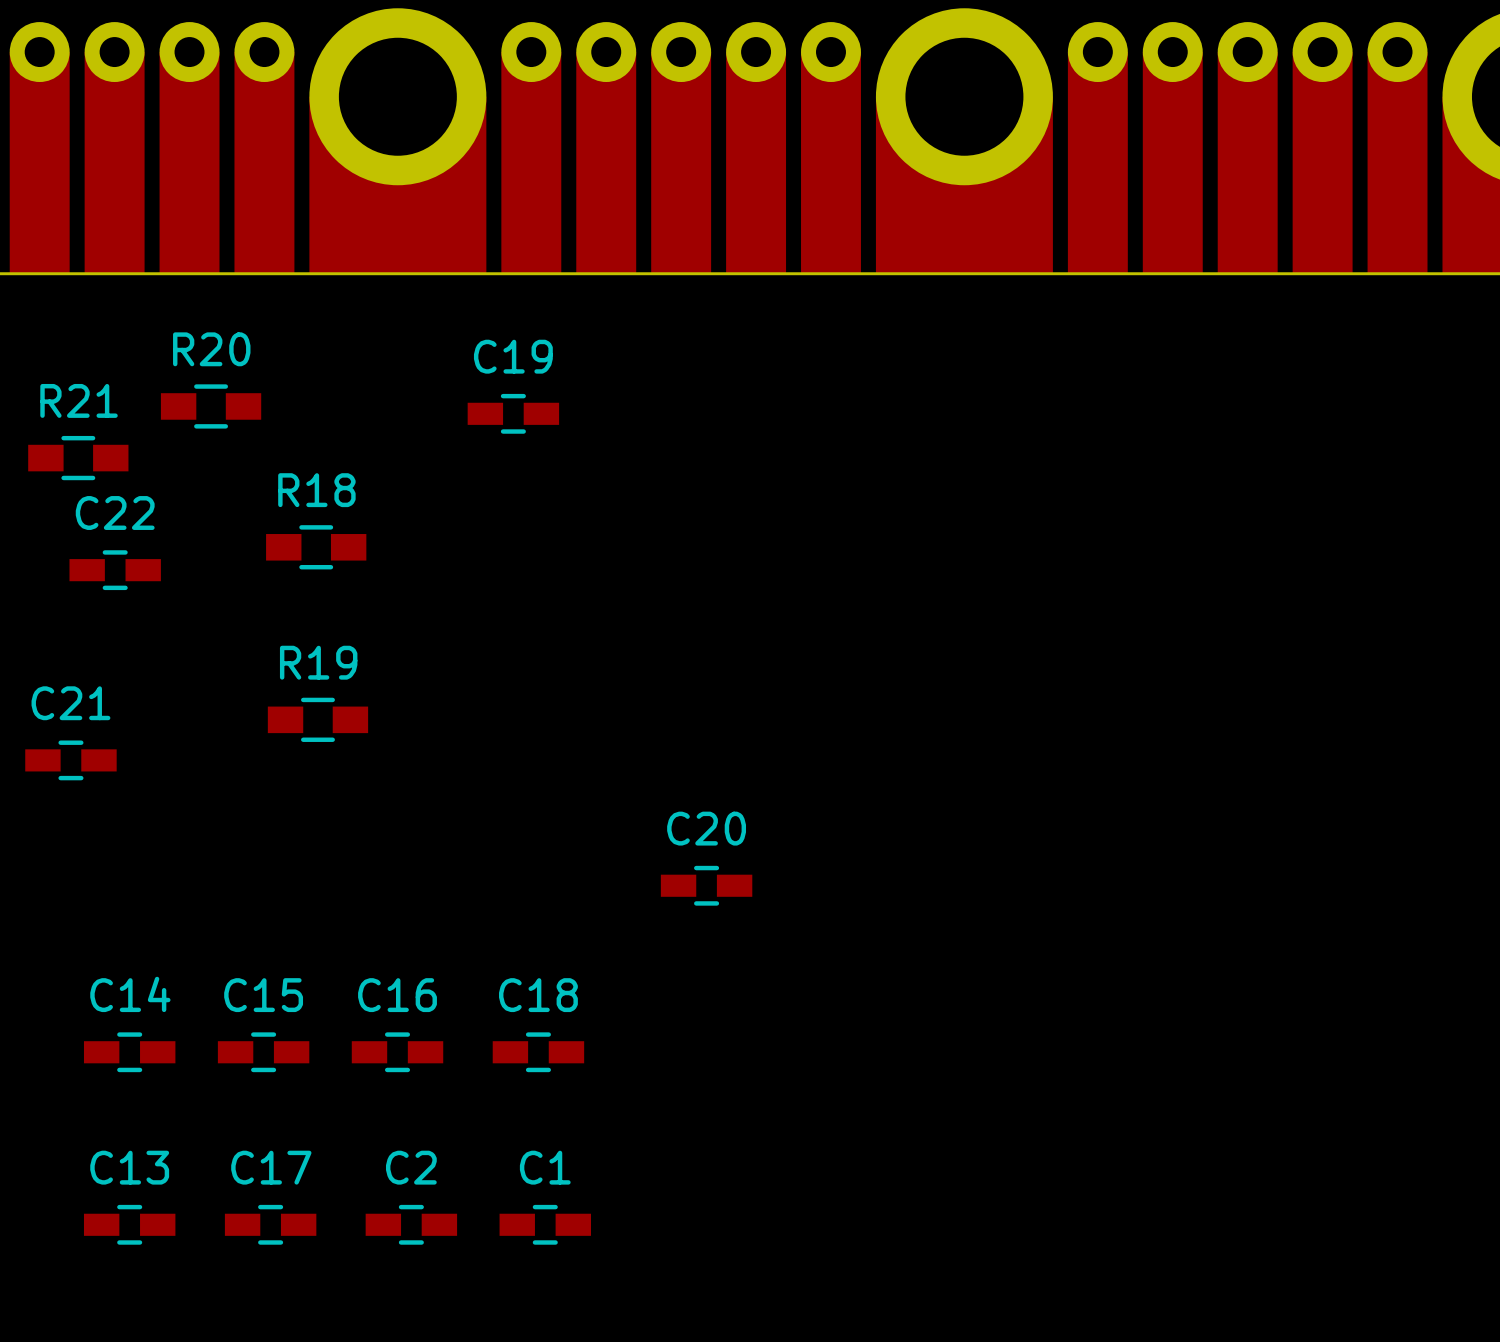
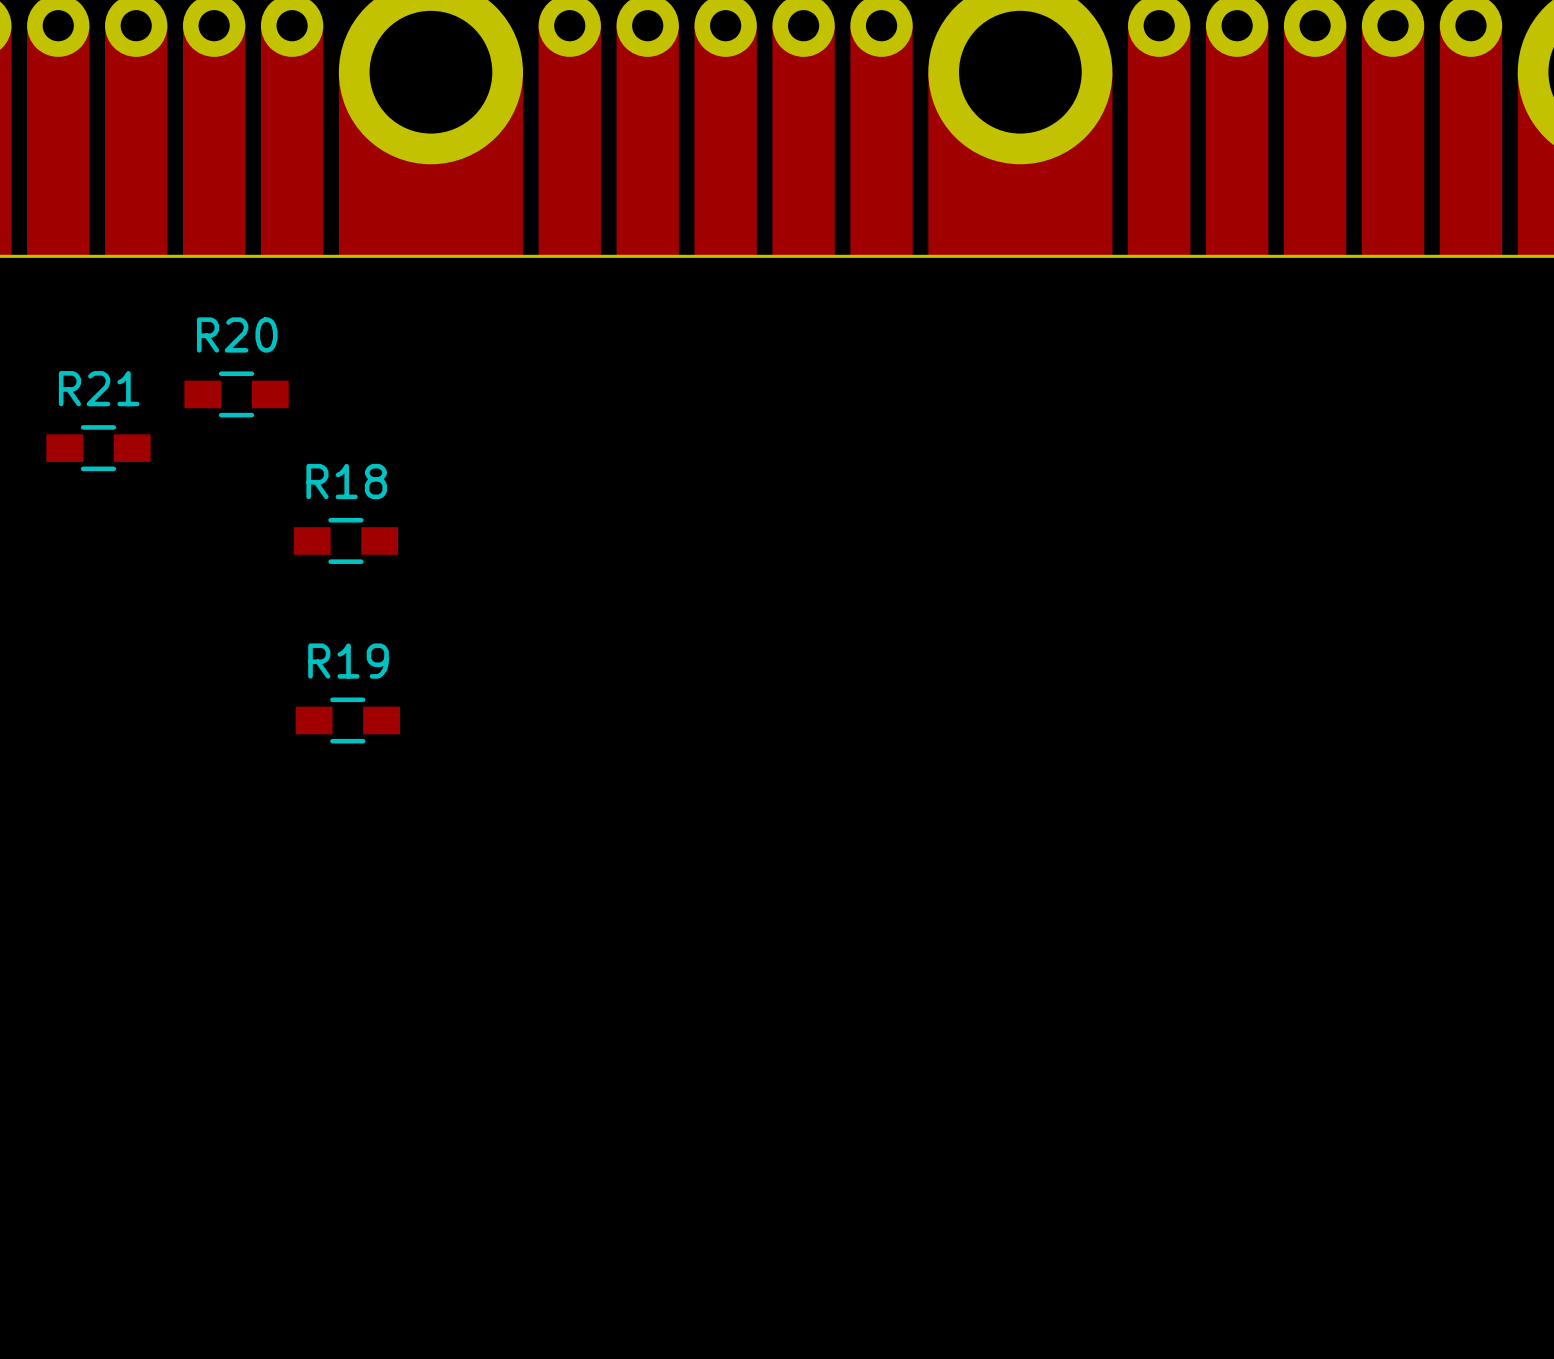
C19: (513, 413) -> none
C22: (115, 570) -> none
C21: (70, 760) -> none
C20: (706, 885) -> none
C14: (129, 1052) -> none
C15: (263, 1052) -> none
C16: (397, 1052) -> none
C18: (538, 1052) -> none
C13: (129, 1224) -> none
C17: (270, 1224) -> none
C2: (411, 1224) -> none
C1: (545, 1224) -> none

